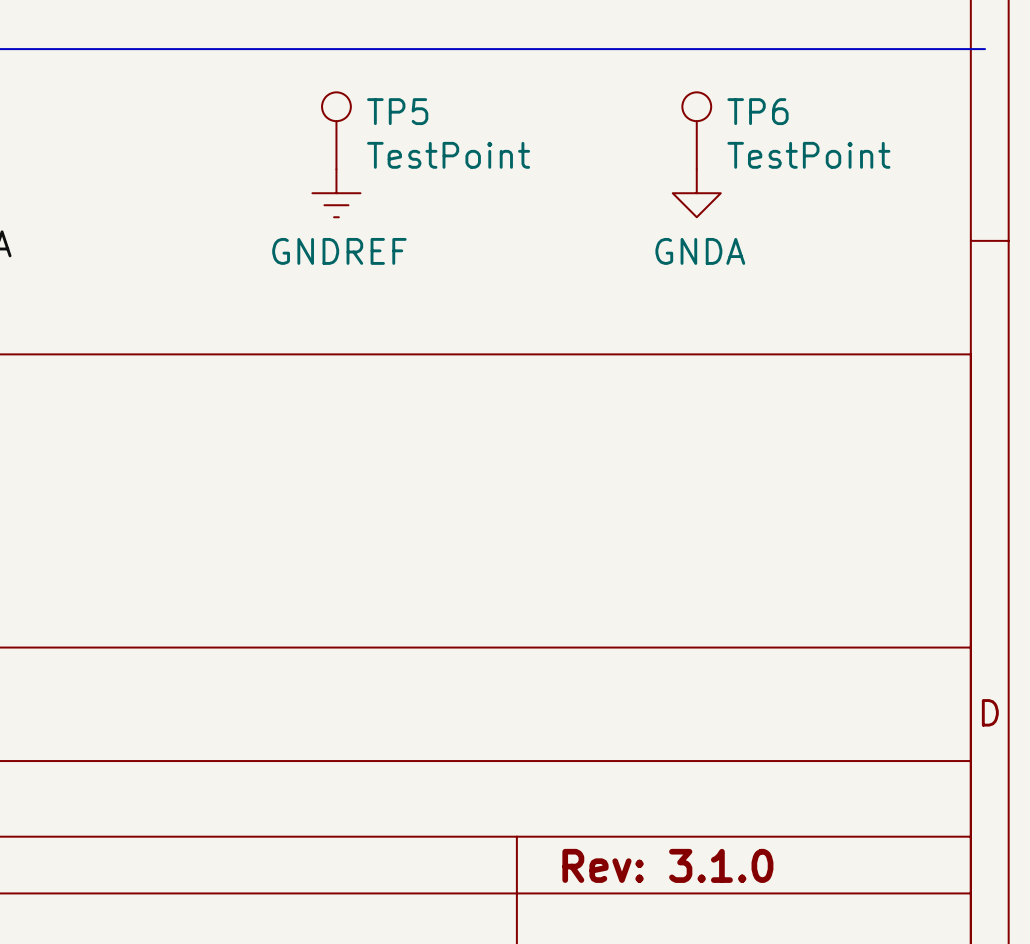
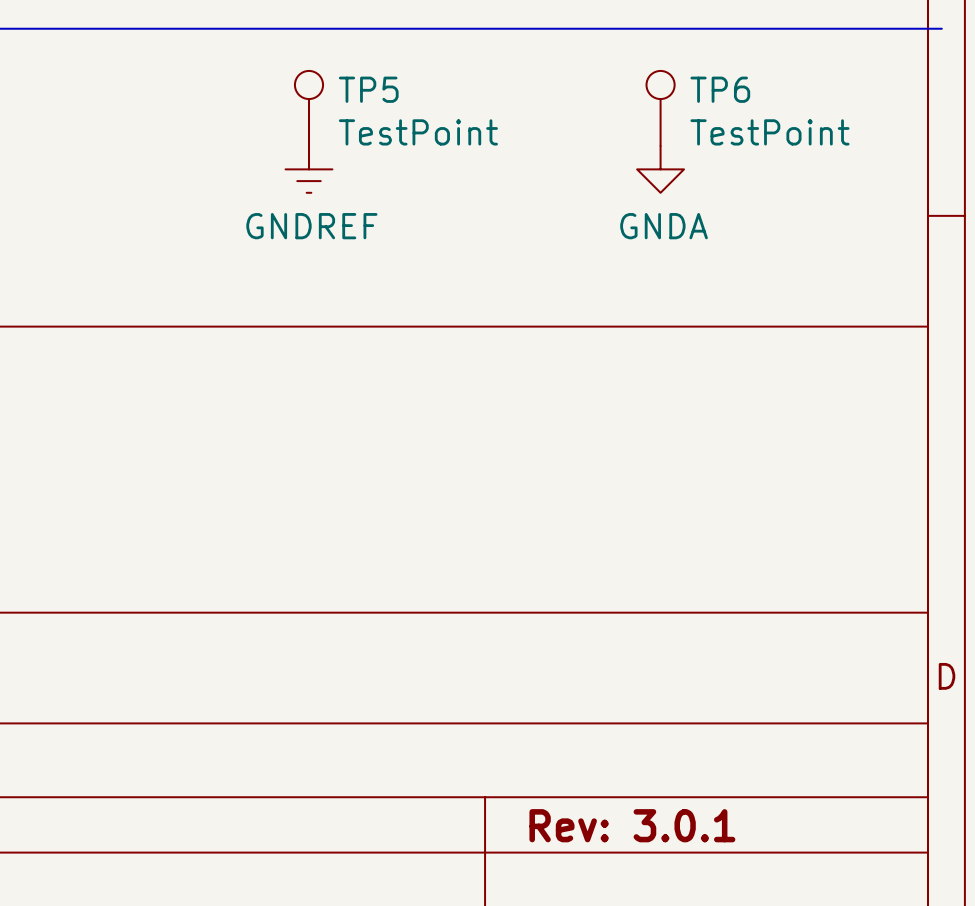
title block: Rev: 3.1.0 (667, 865) -> Rev: 3.0.1 (632, 825)

